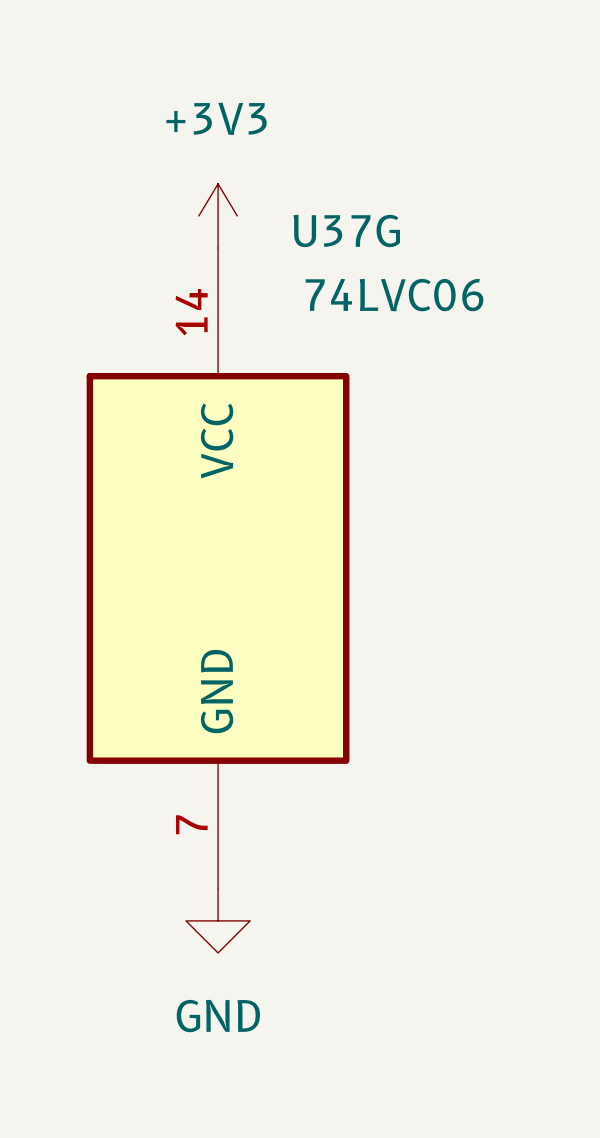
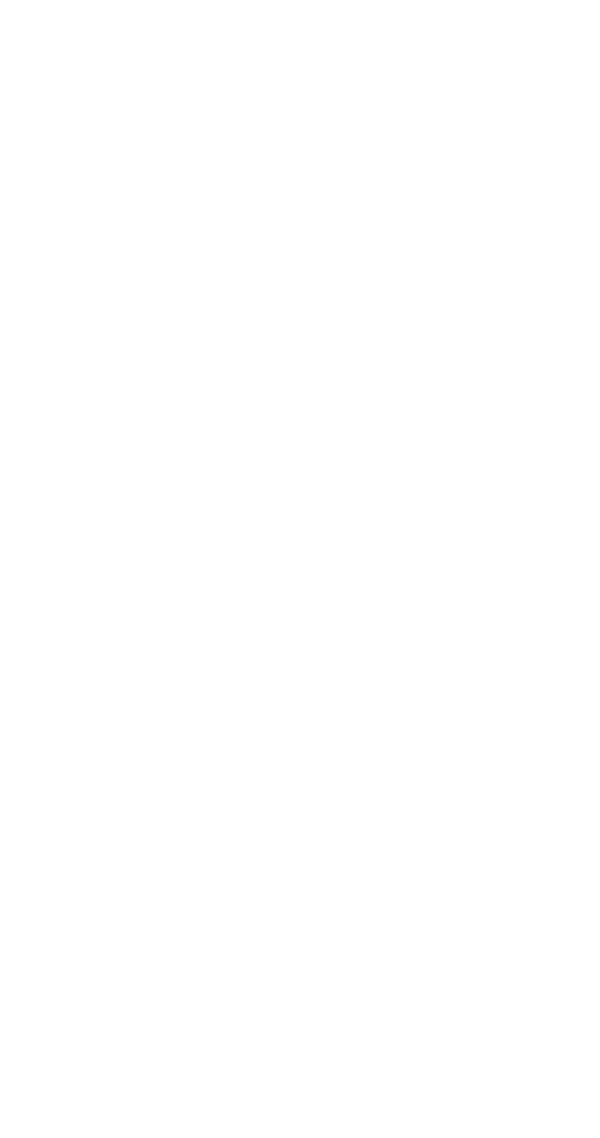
power symbol: +3V3 (218, 215) -> none
U37G: 74LVC06 (218, 568) -> none
power symbol: GND (218, 920) -> none

